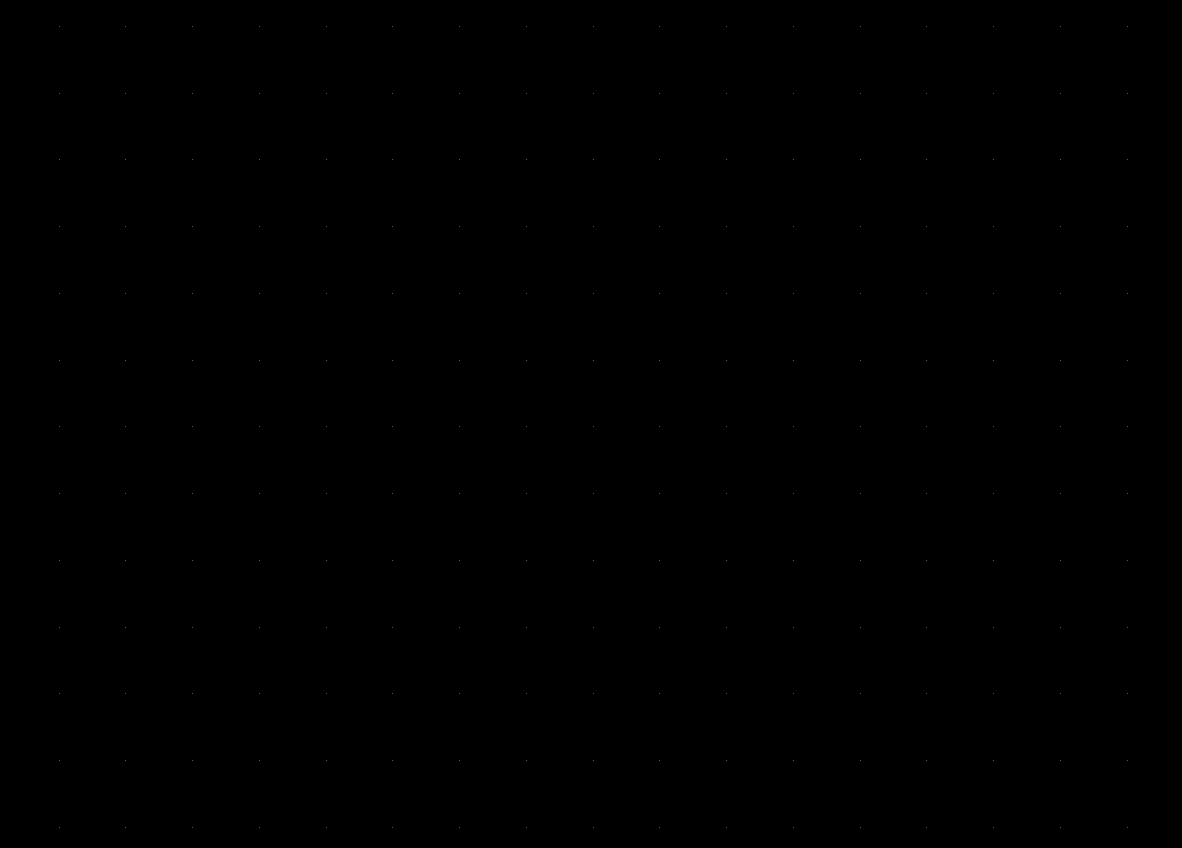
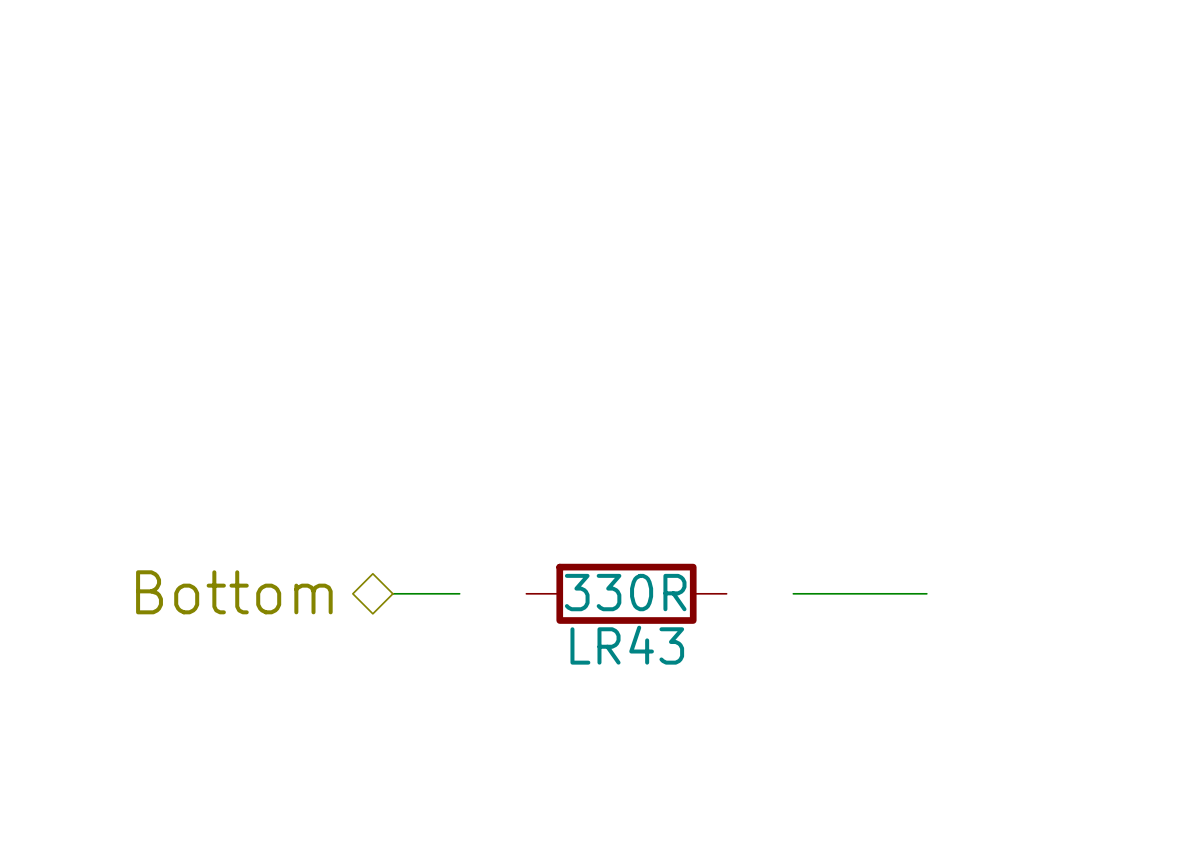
hierarchical label: none -> Bottom (234, 592)
wire: none -> (392, 593) (459, 593)
LR43: none -> 330R (626, 593)
wire: none -> (793, 593) (926, 593)

